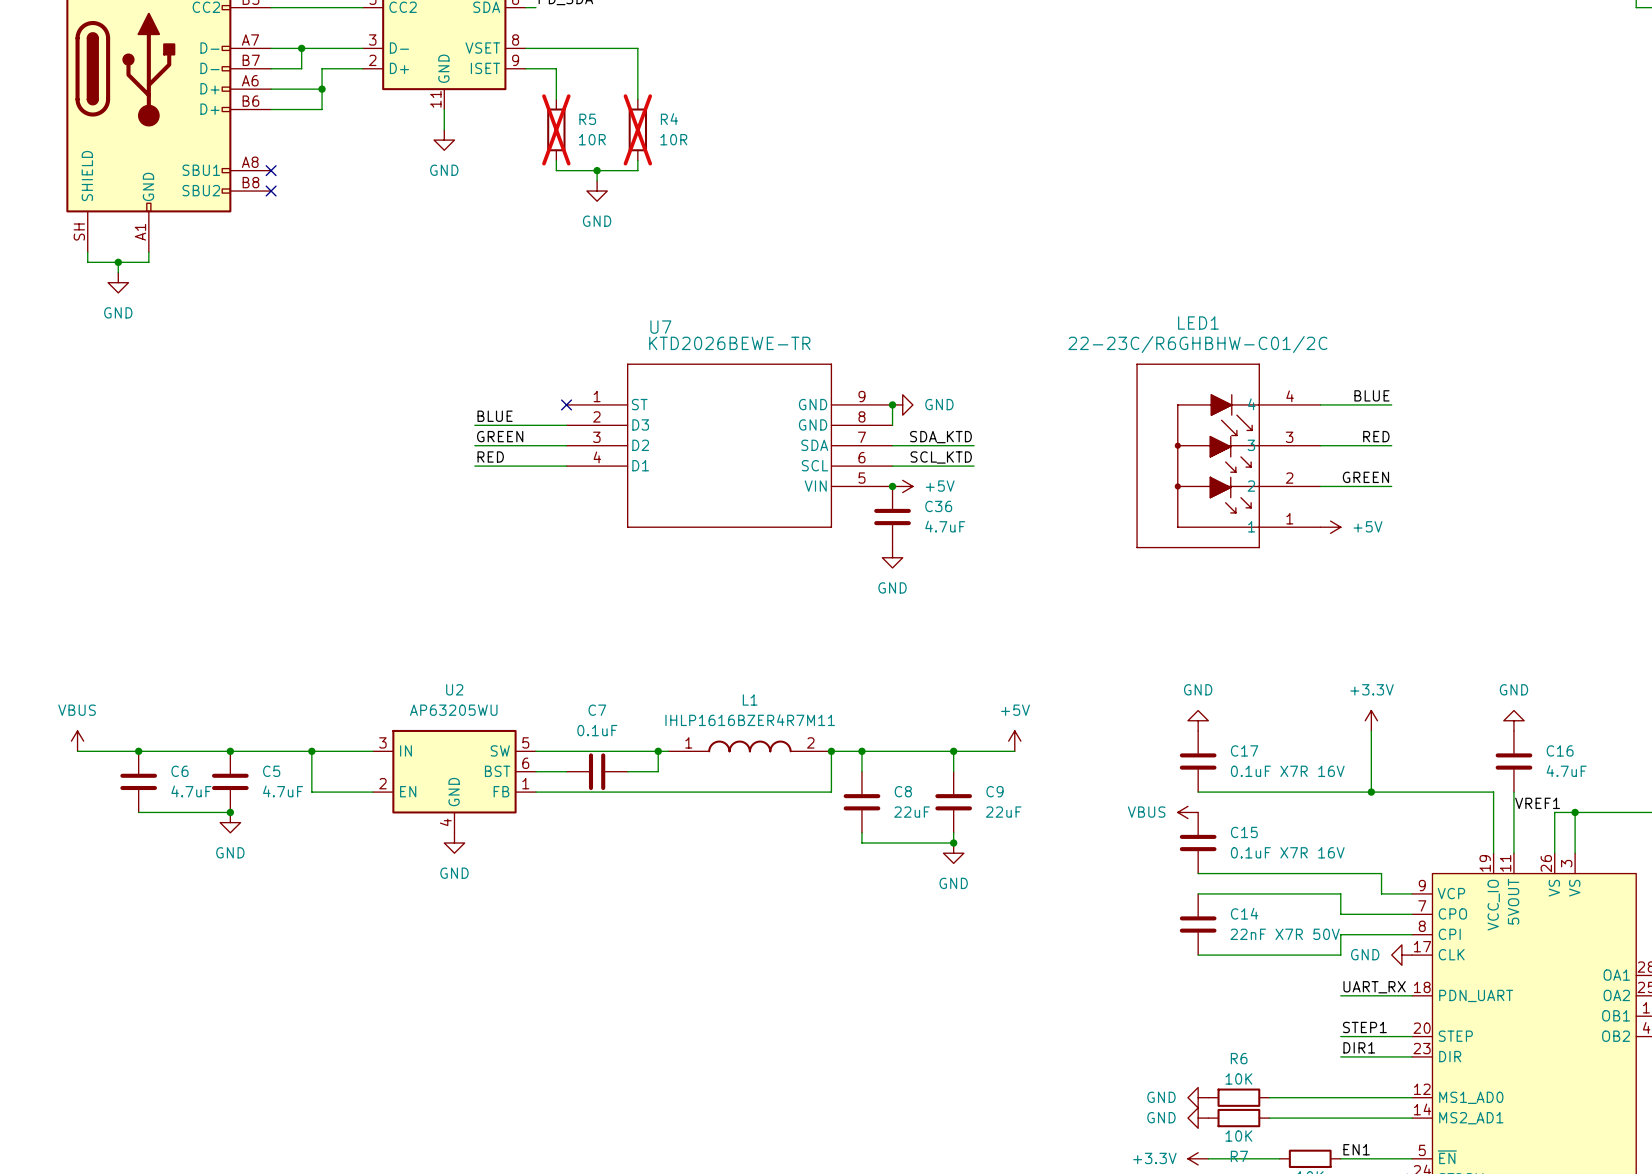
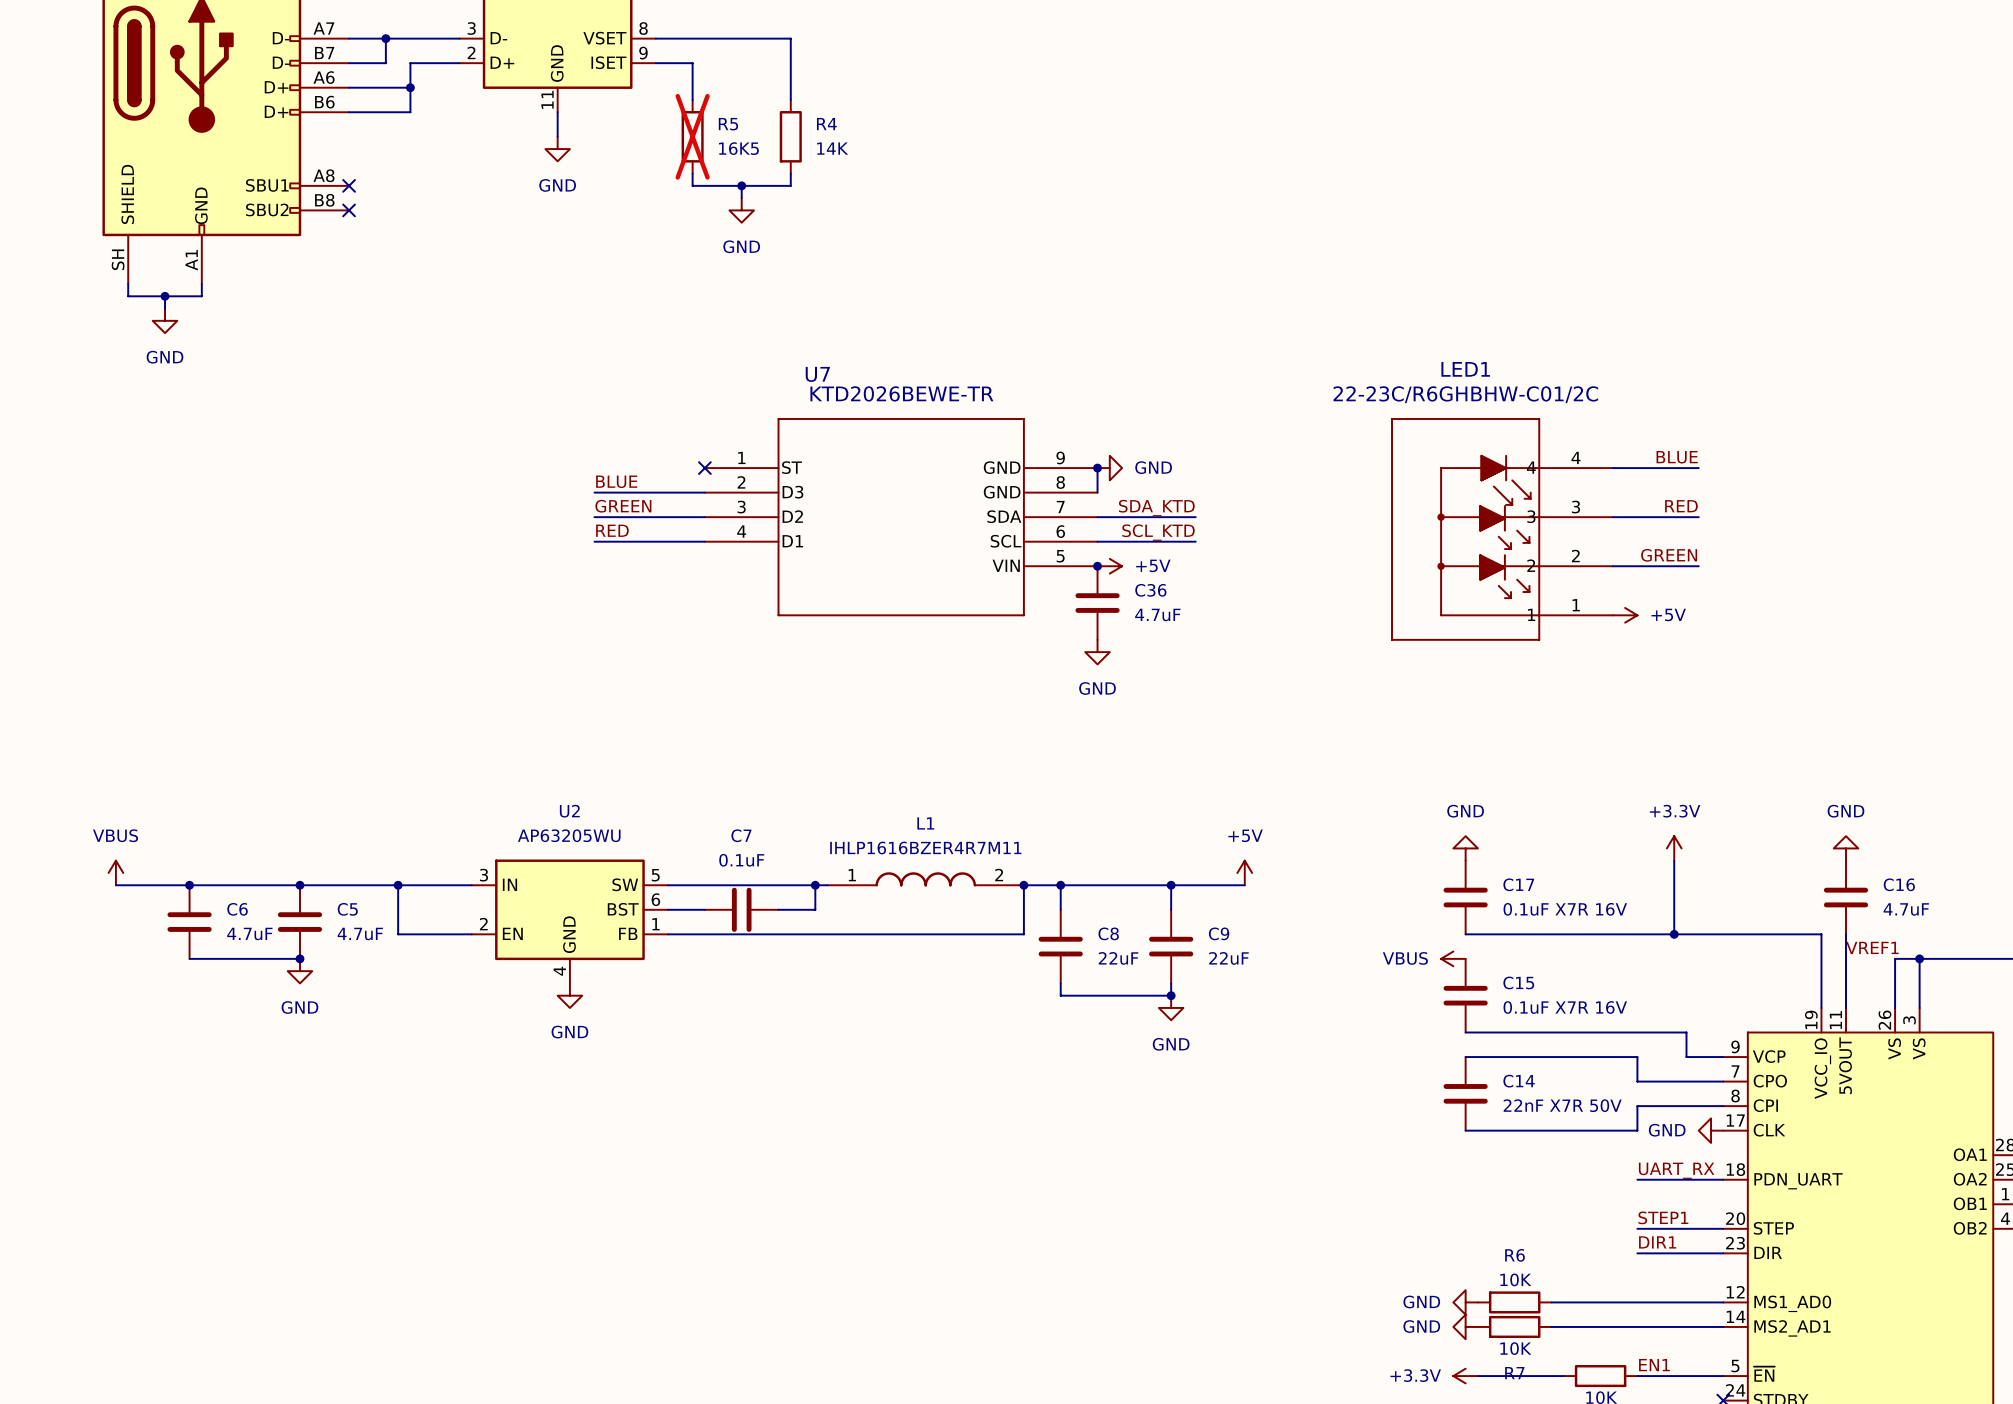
R4 do-not-place cross: (637, 129) -> none
R5 value: 10R (592, 139) -> 16K5 (738, 148)
R4 value: 10R (673, 139) -> 14K (832, 148)

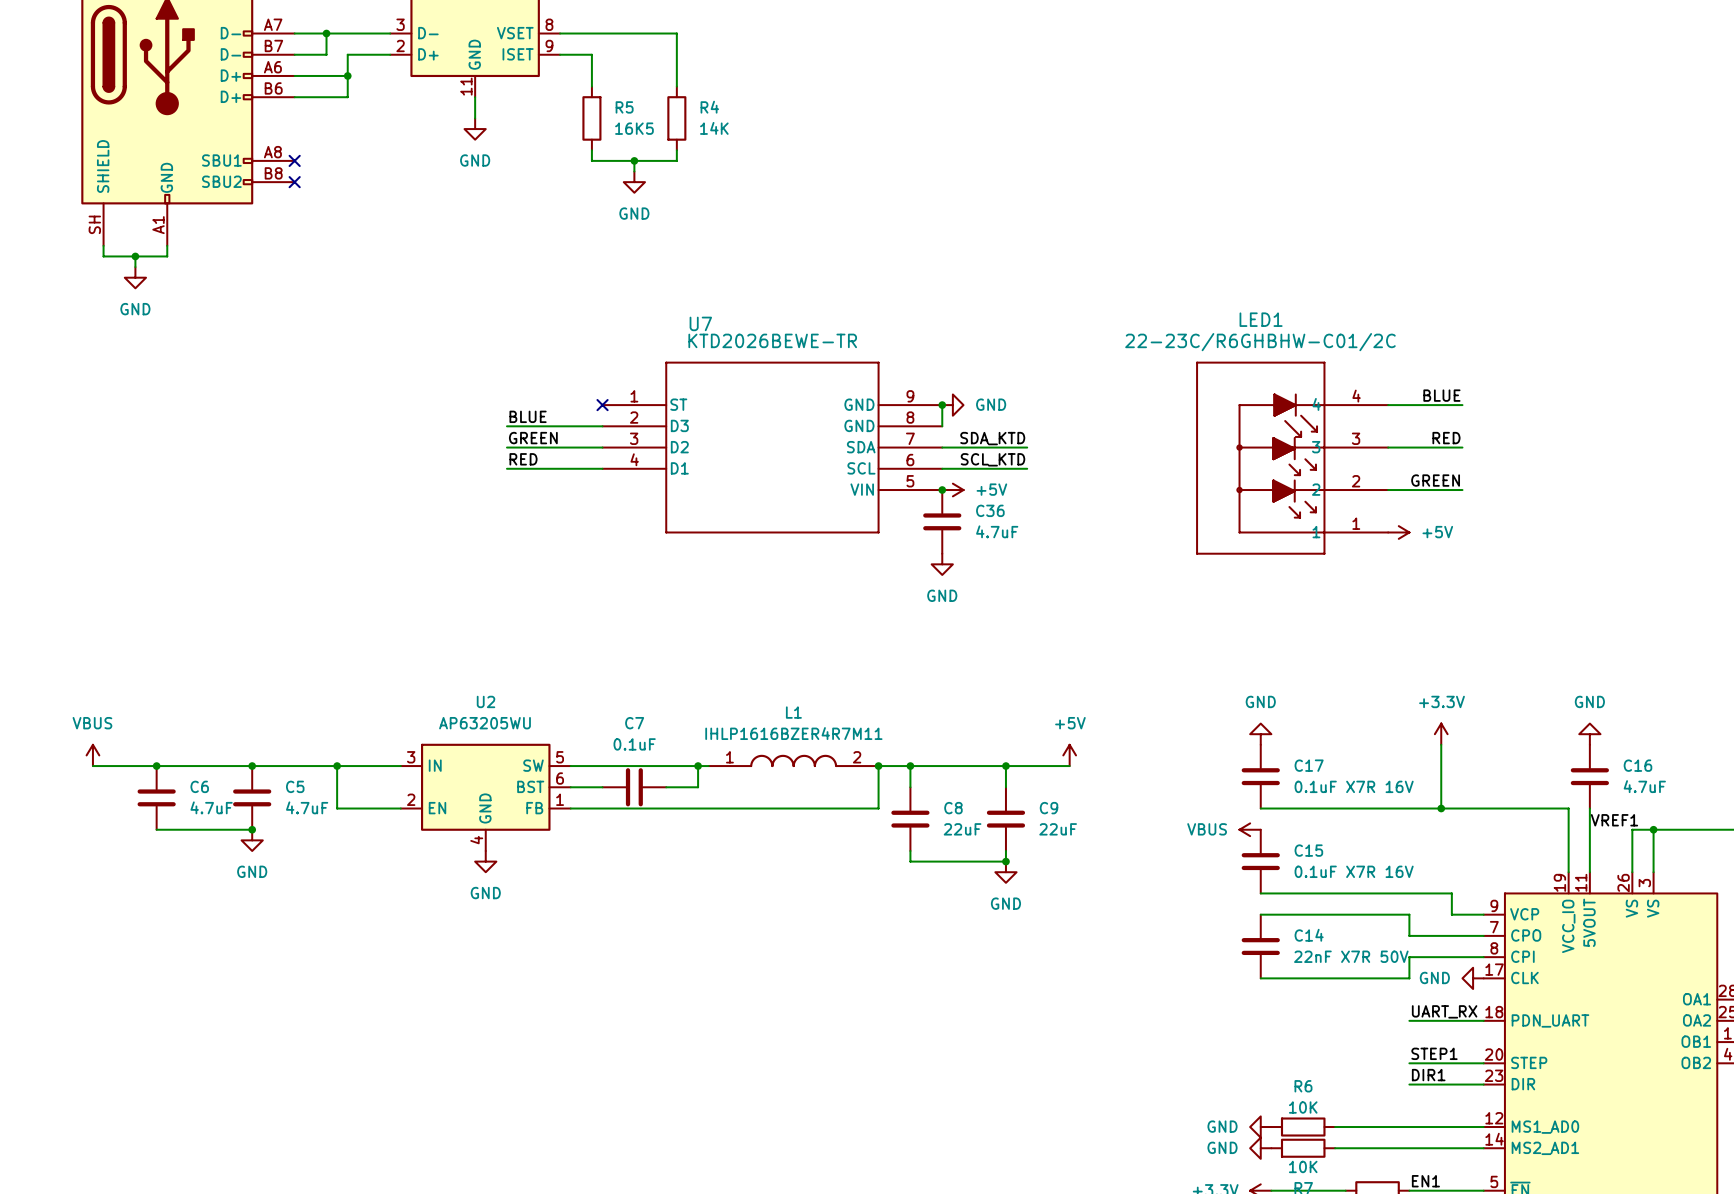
R5 do-not-place cross: (692, 136) -> none

